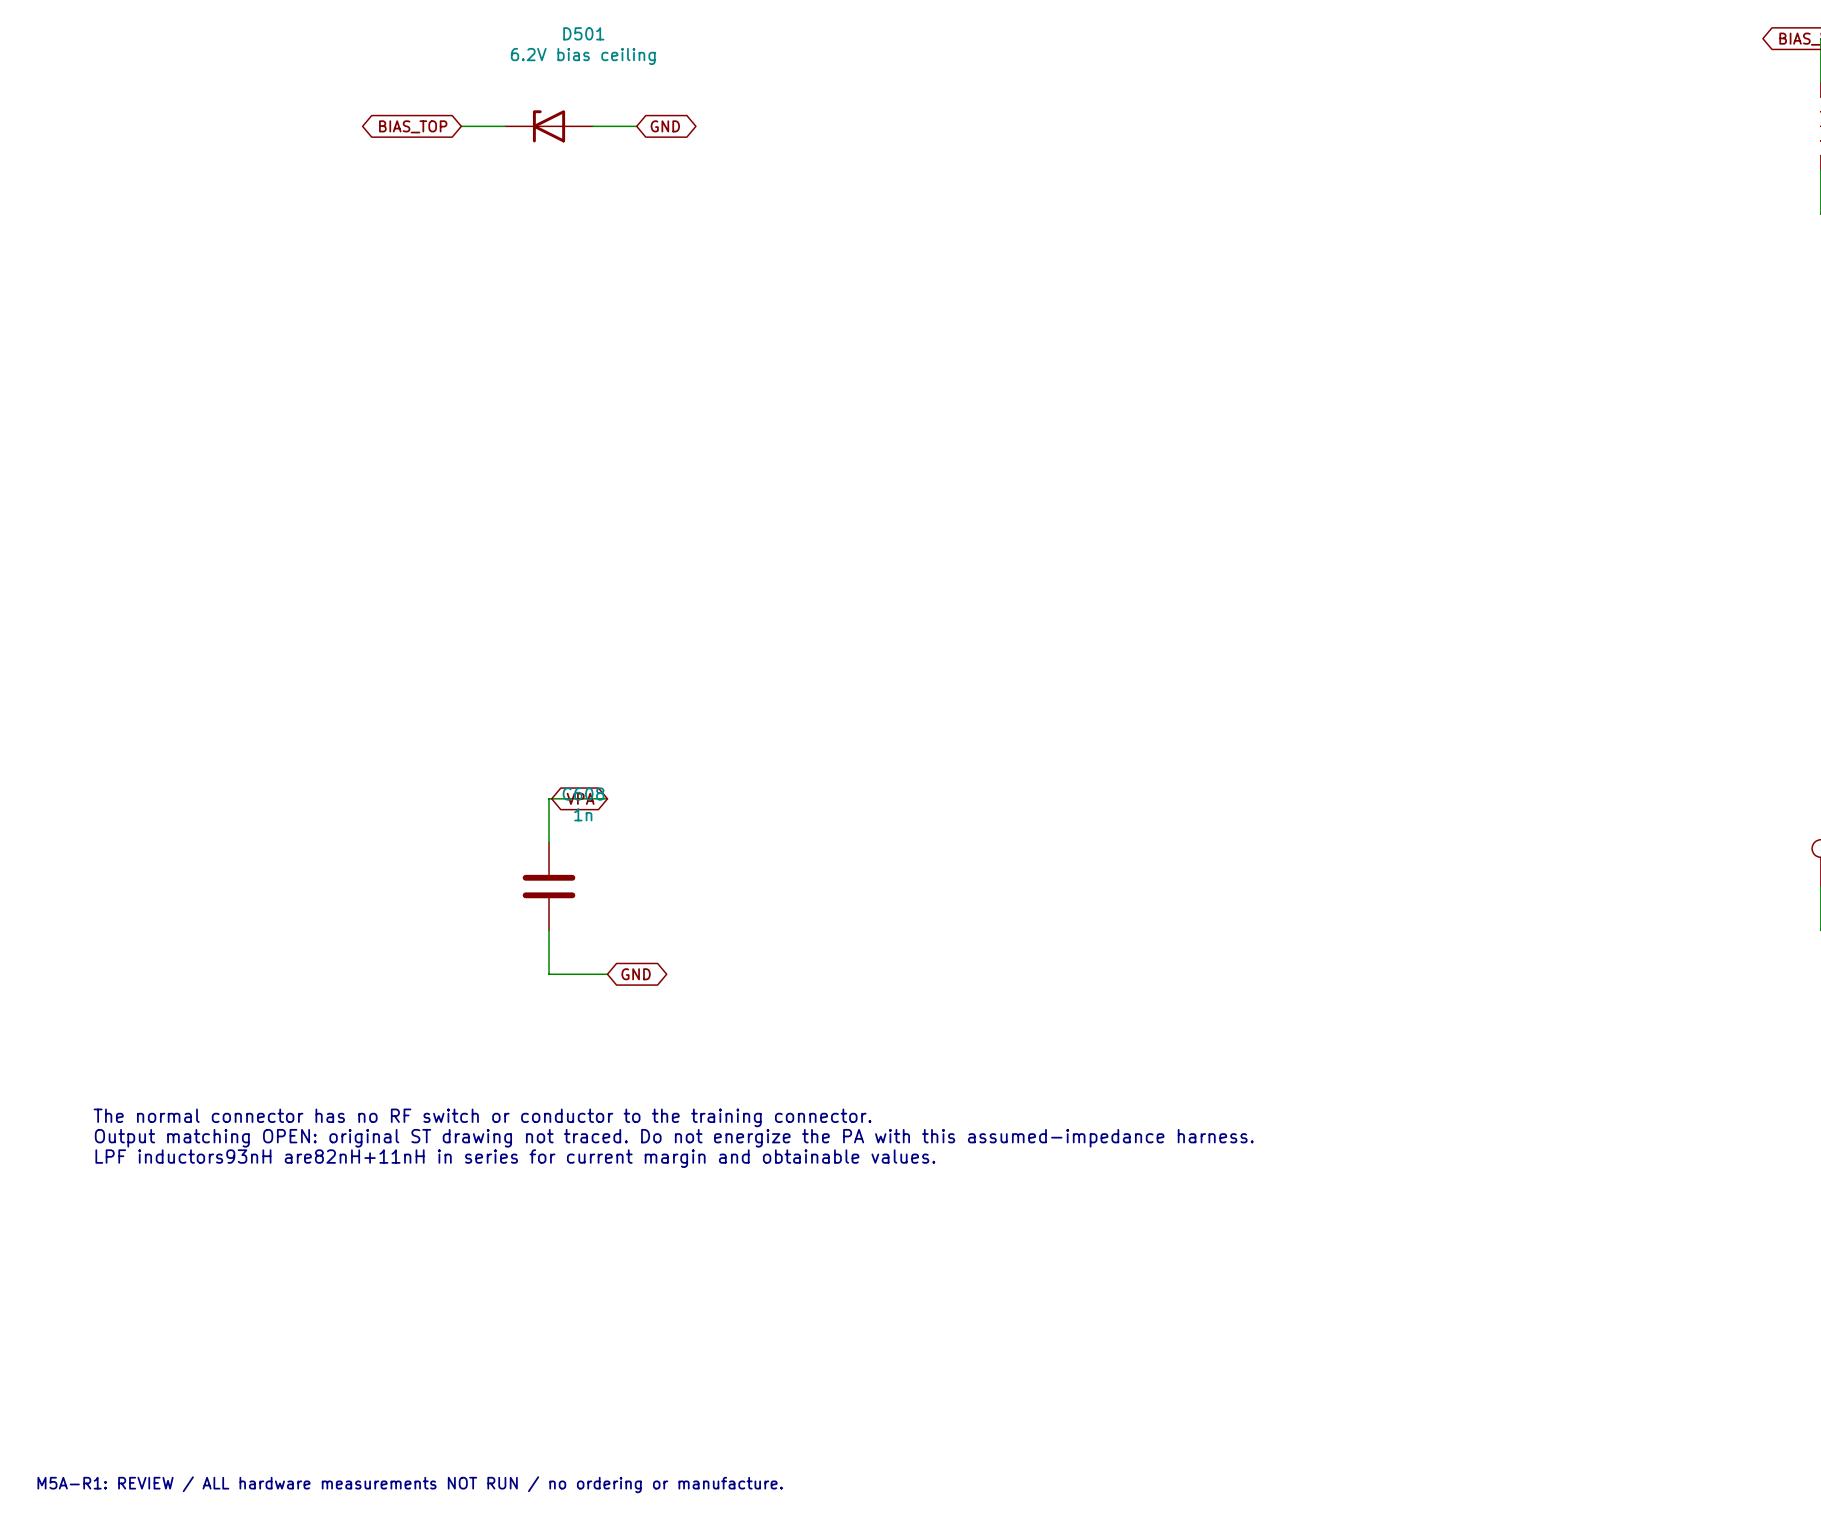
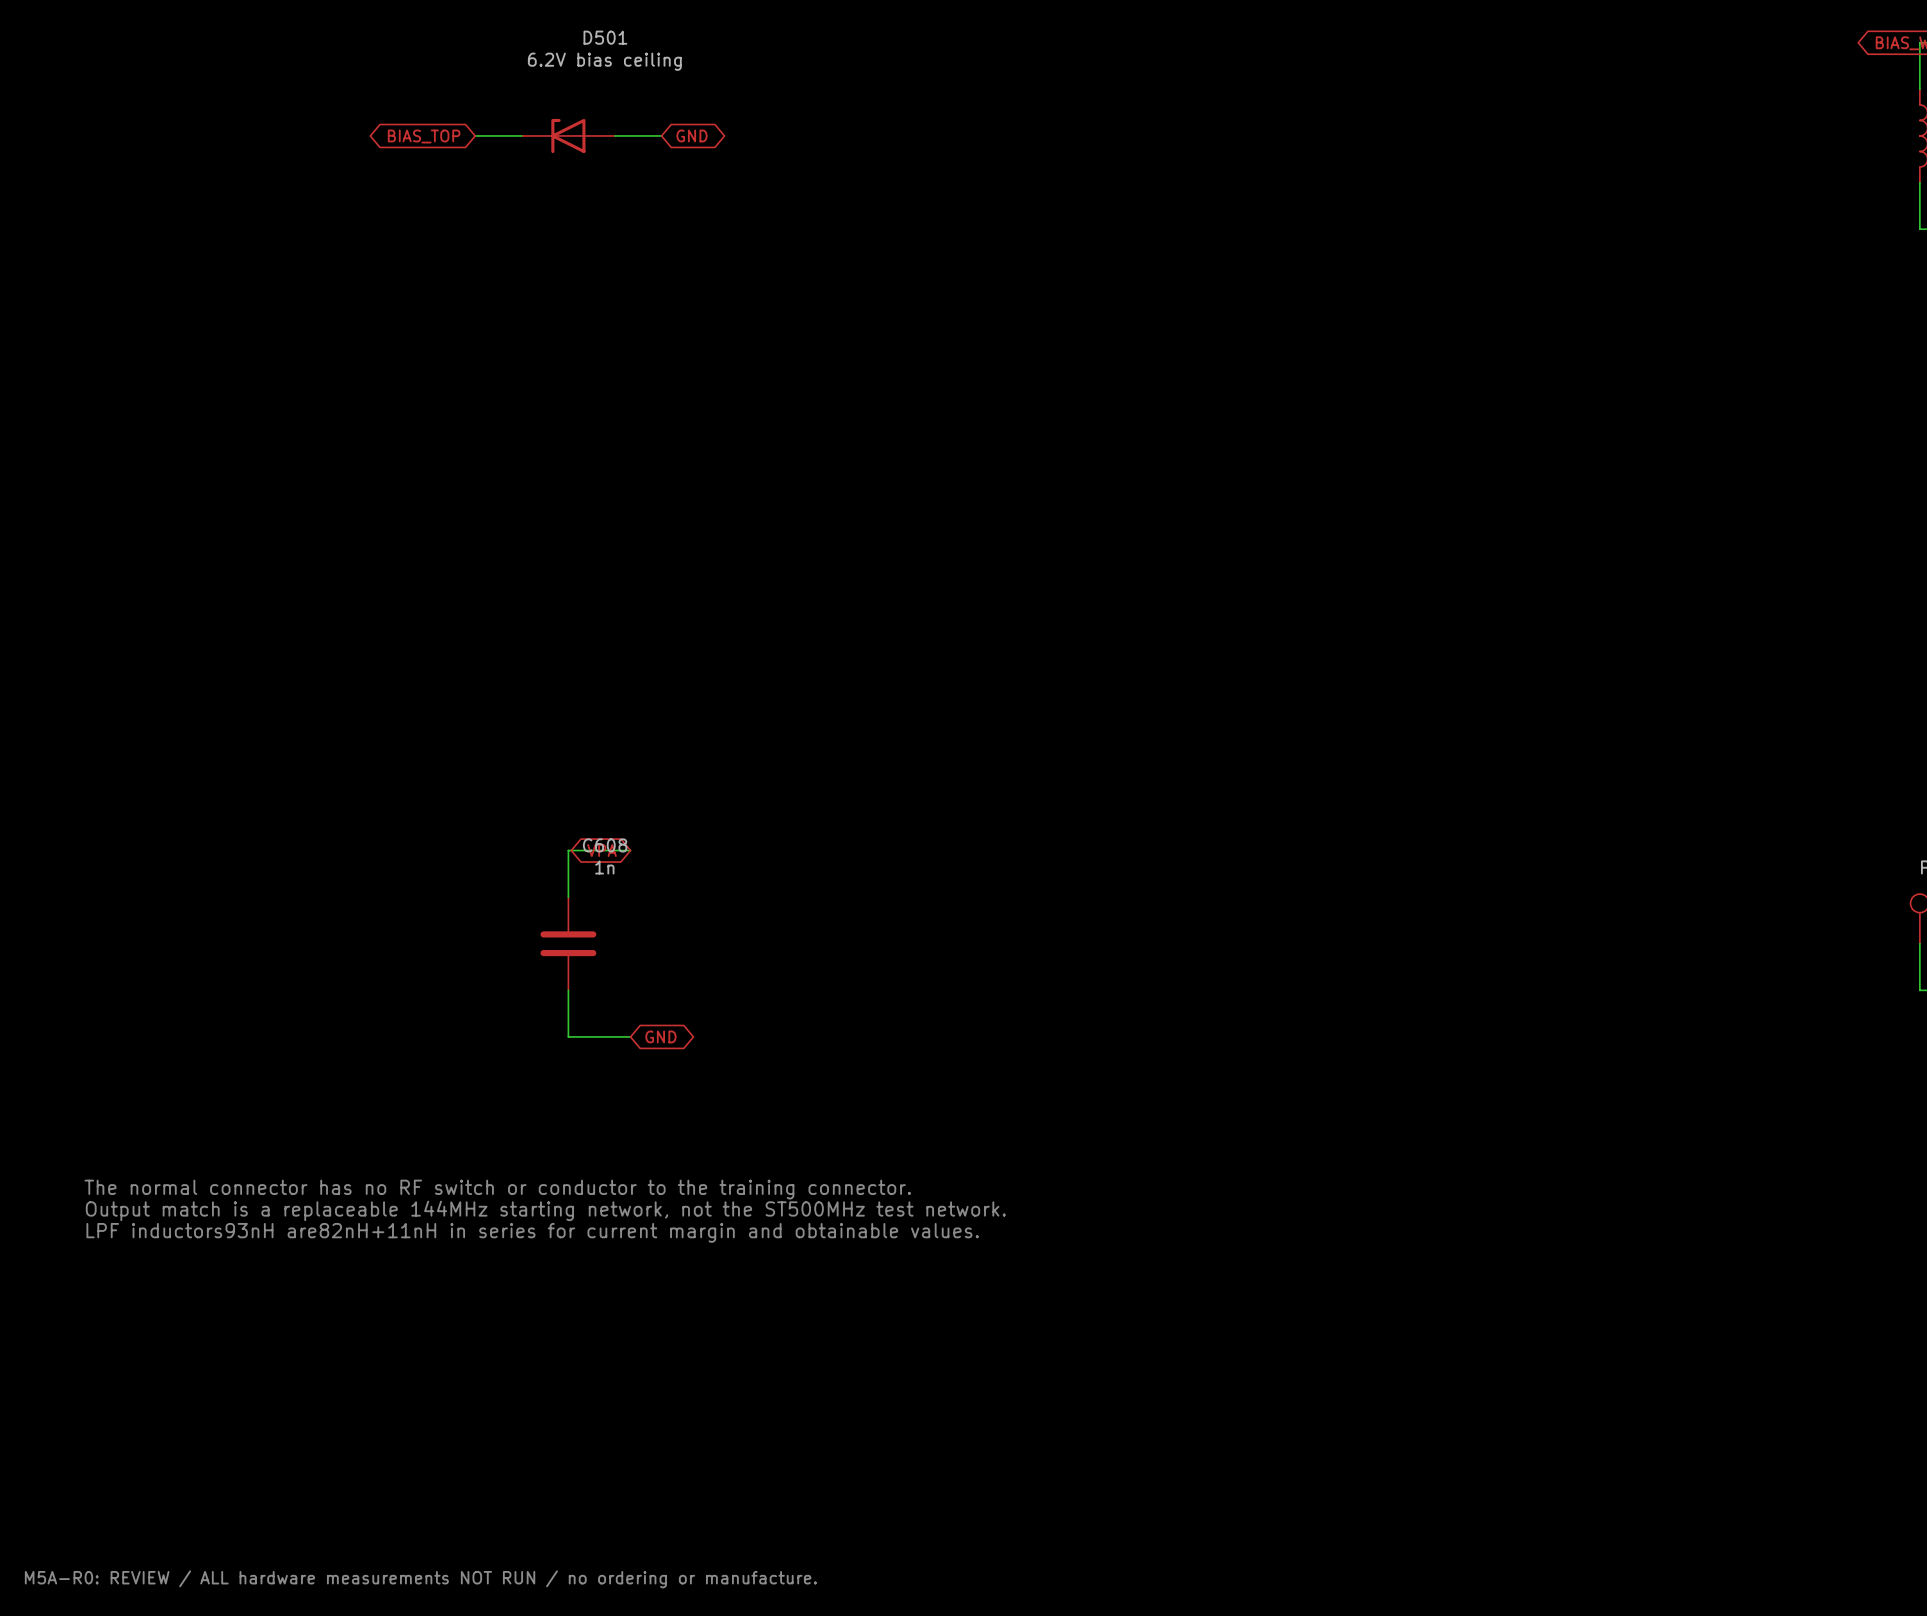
text: Output matching OPEN: original ST drawing not traced. Do not energize the PA with this assumed-impedance harness. (674, 1138) -> Output match is a replaceable 144MHz starting network, not the ST500MHz test network. (545, 1210)
text: M5A-R1: REVIEW / ALL hardware measurements NOT RUN / no ordering or manufacture. (410, 1484) -> M5A-R0: REVIEW / ALL hardware measurements NOT RUN / no ordering or manufacture. (420, 1579)

